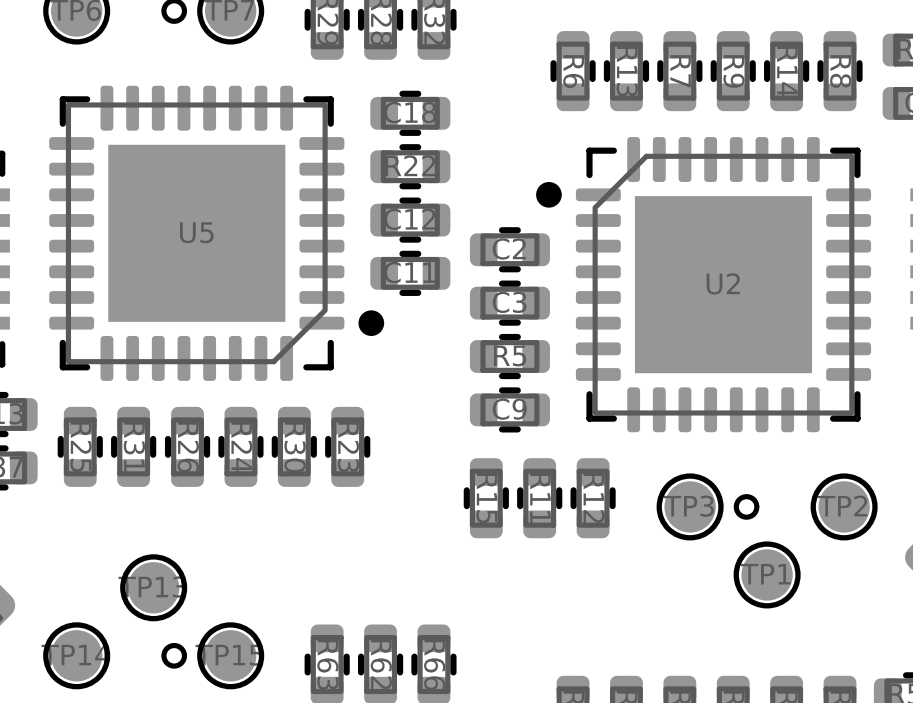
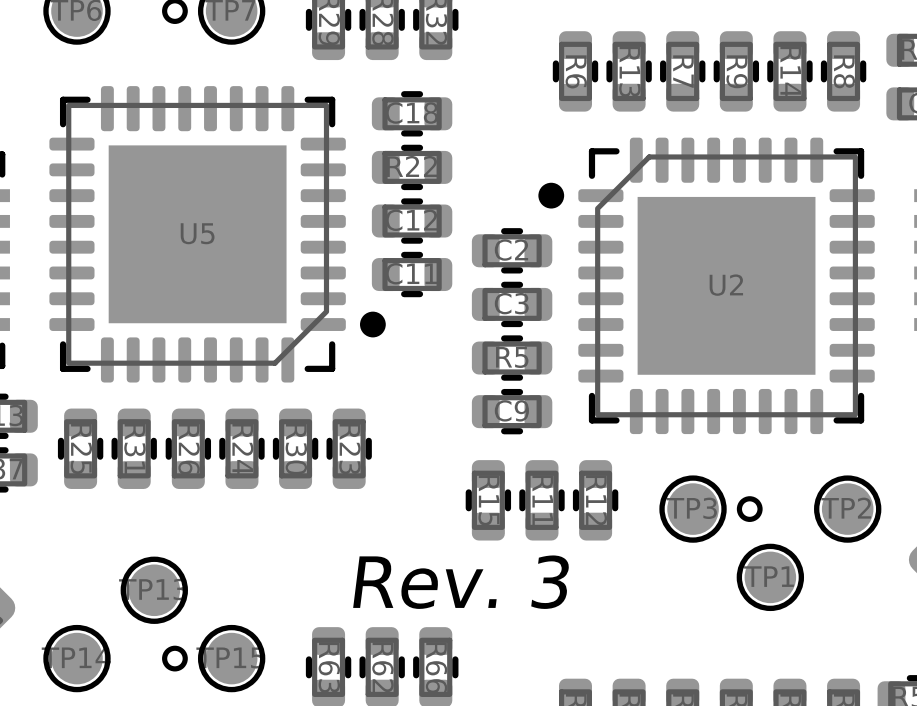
text: none -> Rev. 3 (461, 582)

